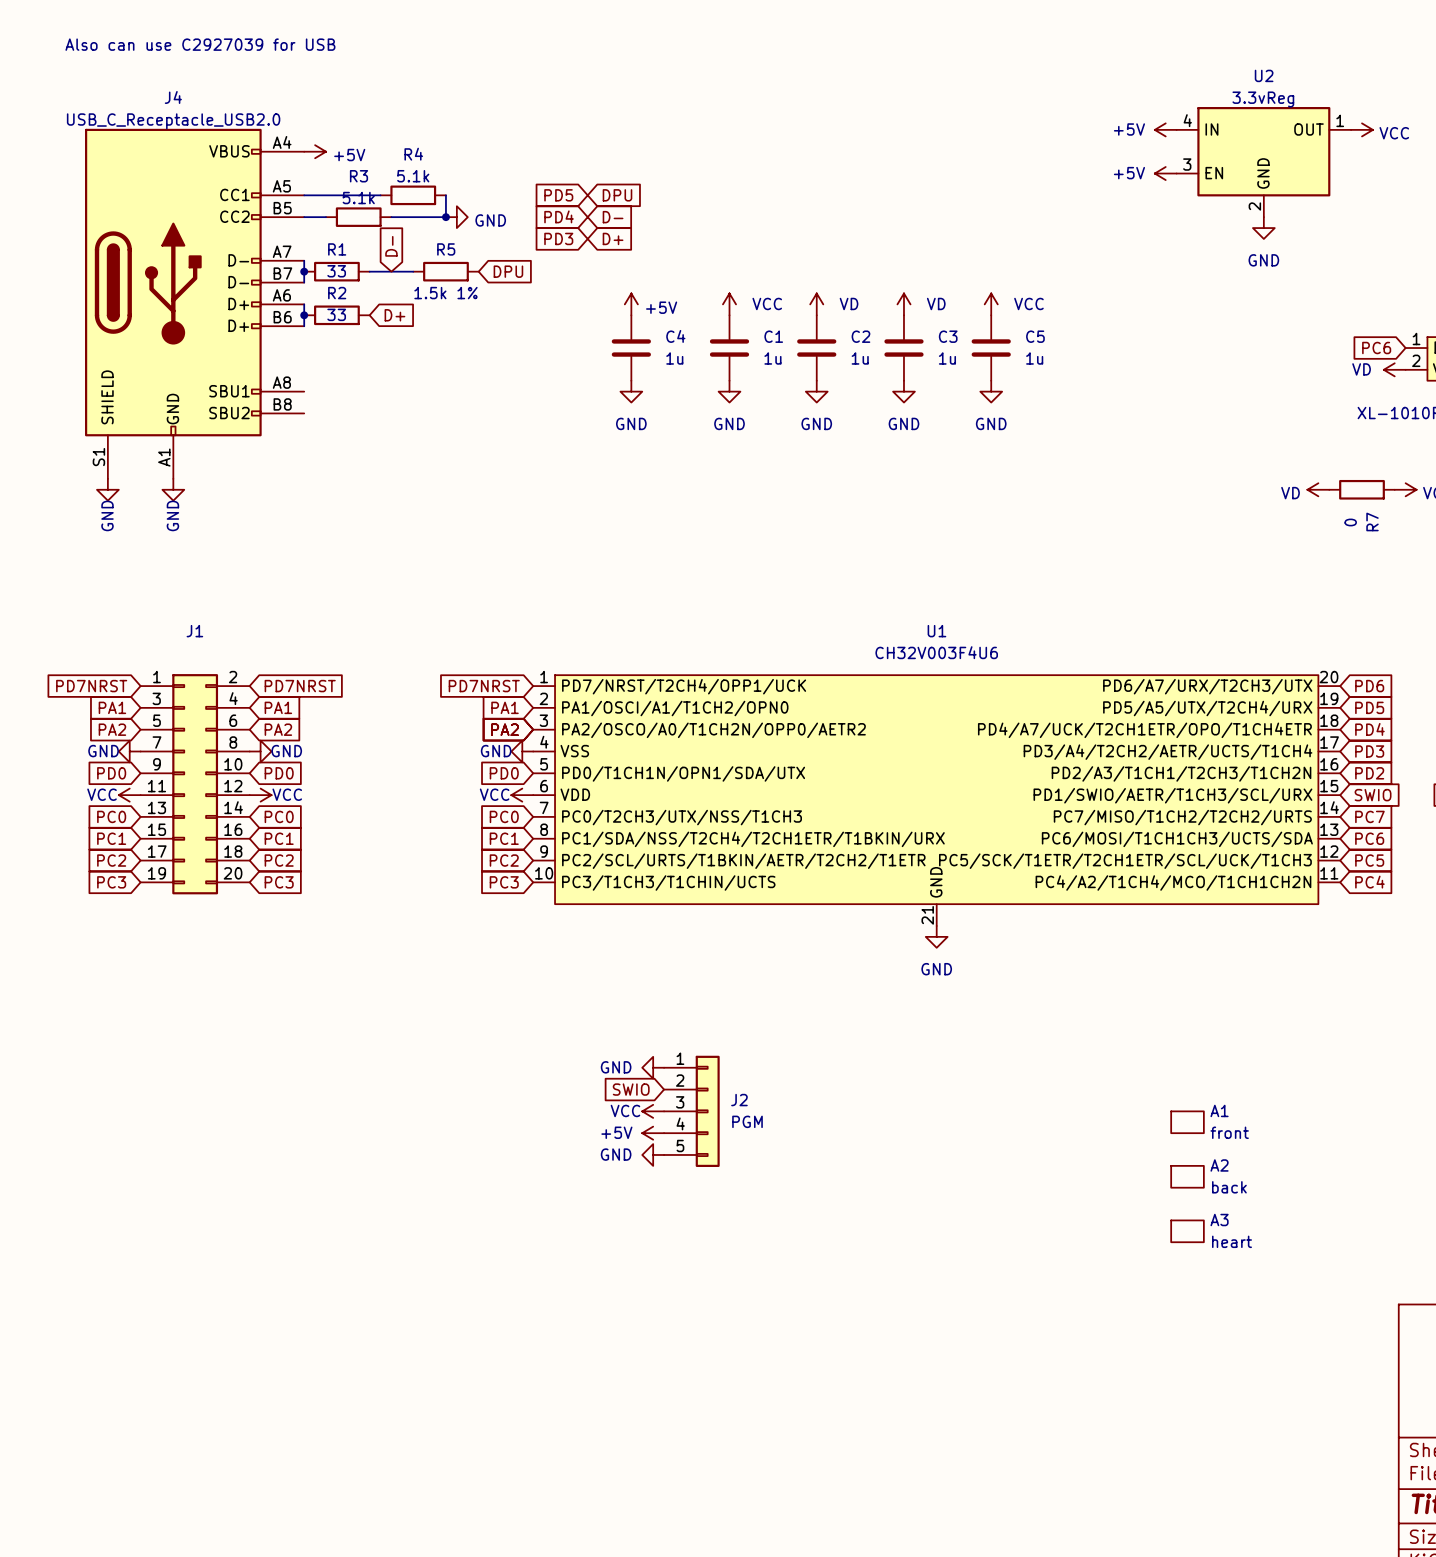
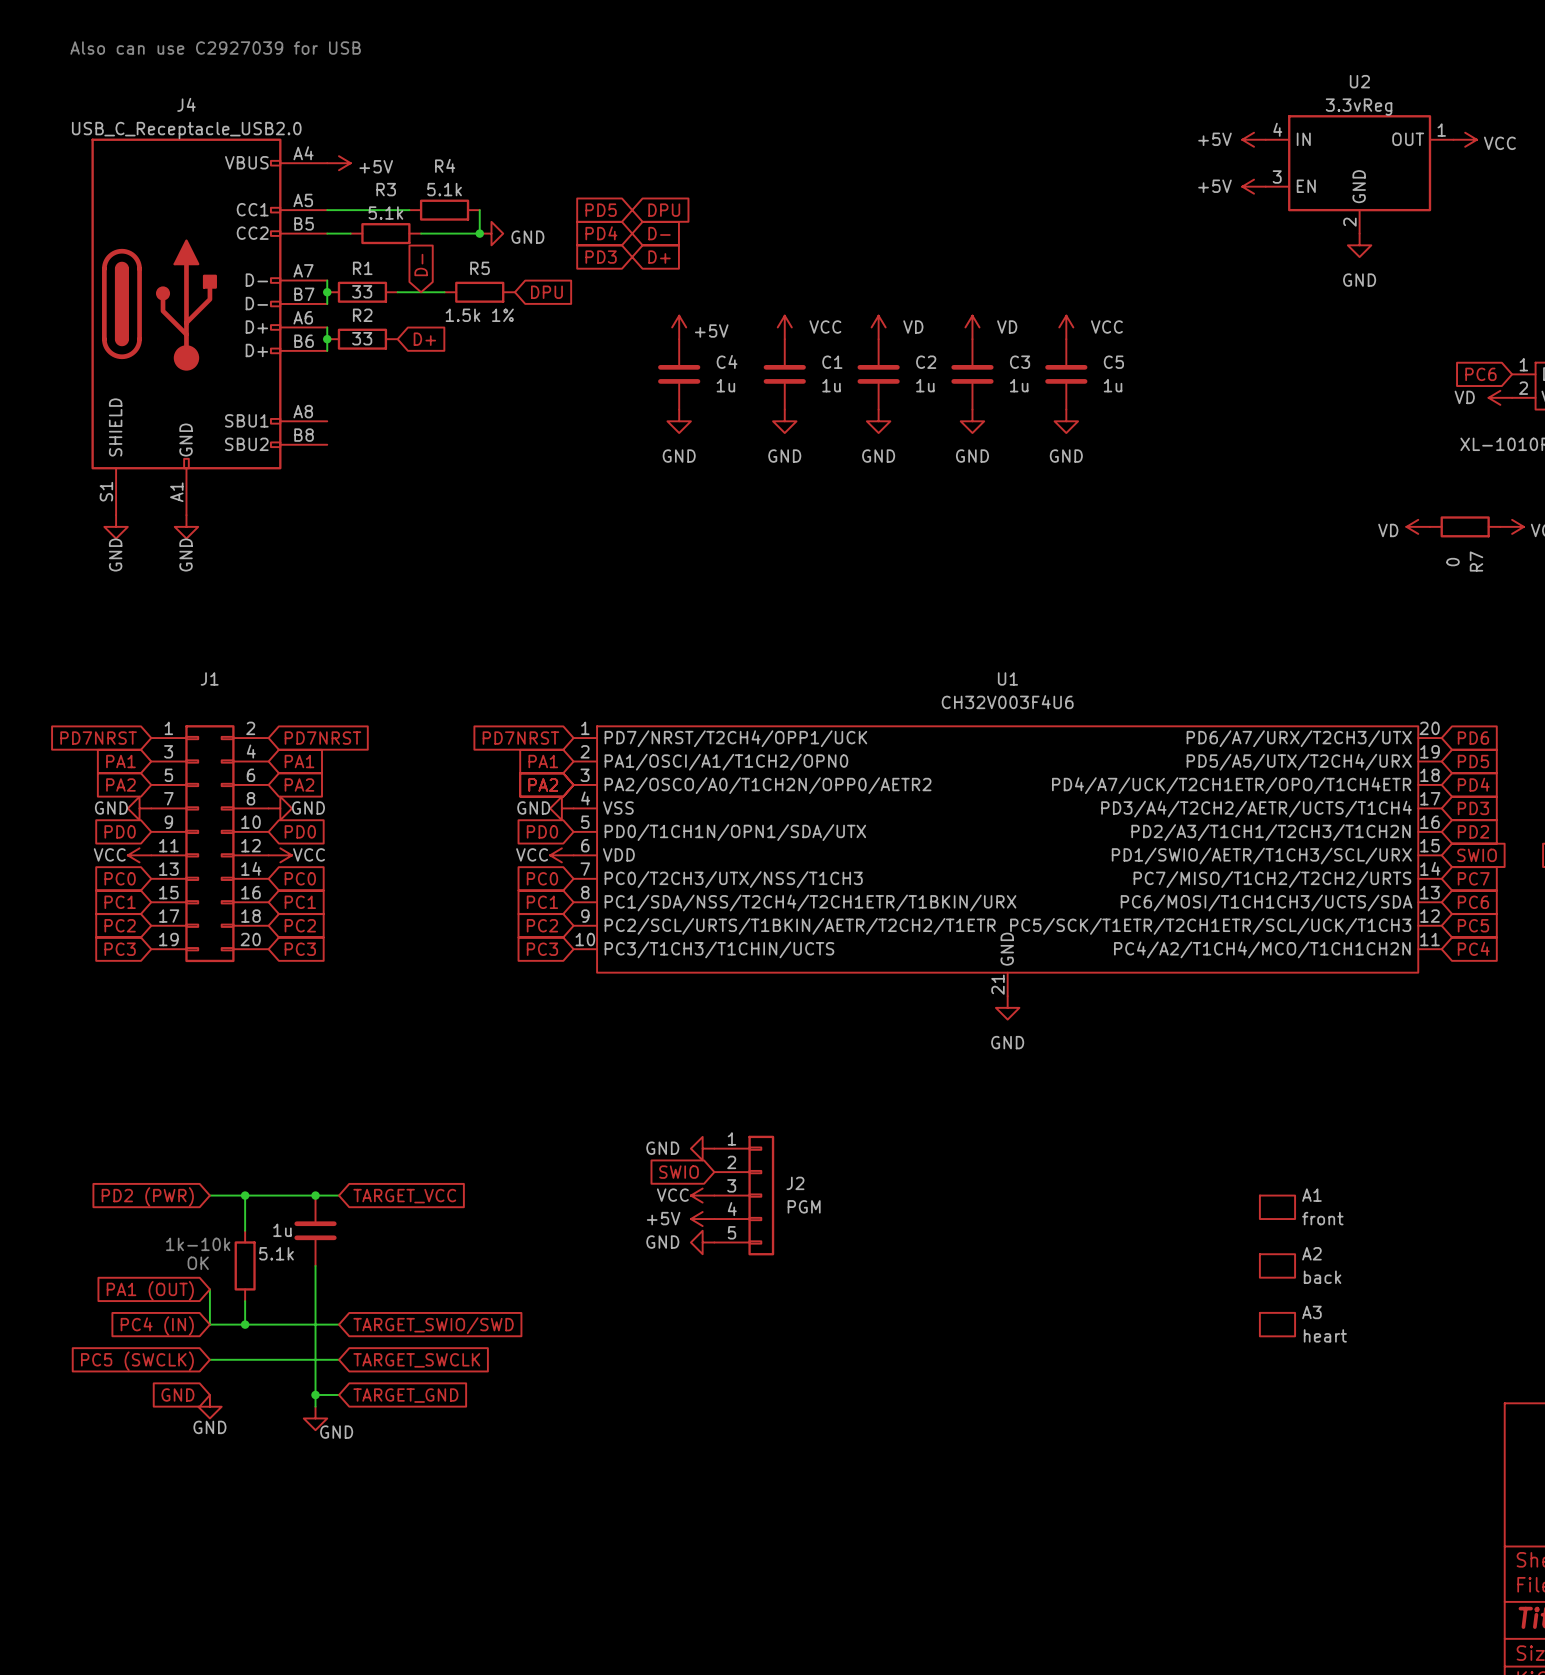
wire: none -> (209, 1195) (338, 1195)
wire: none -> (245, 1195) (245, 1230)
junction: none -> (245, 1195)
junction: none -> (315, 1195)
global label: none -> TARGET_VCC (404, 1196)
global label: none -> PD2 (PWR) (147, 1196)
part: none -> 1u (315, 1230)
text: none -> 1k-10k (198, 1244)
text: none -> OK (198, 1263)
part: none -> 5.1k (245, 1265)
wire: none -> (315, 1265) (315, 1406)
wire: none -> (209, 1289) (209, 1324) (338, 1324)
global label: none -> PA1 (OUT) (150, 1290)
wire: none -> (245, 1301) (245, 1324)
junction: none -> (245, 1324)
global label: none -> PC4 (IN) (157, 1326)
global label: none -> TARGET_SWIO/SWD (433, 1325)
wire: none -> (209, 1359) (338, 1359)
global label: none -> TARGET_SWCLK (416, 1360)
global label: none -> PC5 (SWCLK) (137, 1361)
global label: none -> GND (177, 1394)
wire: none -> (315, 1394) (338, 1394)
junction: none -> (315, 1394)
global label: none -> TARGET_GND (405, 1395)
power symbol: none -> GND (209, 1406)
power symbol: none -> GND (315, 1418)

